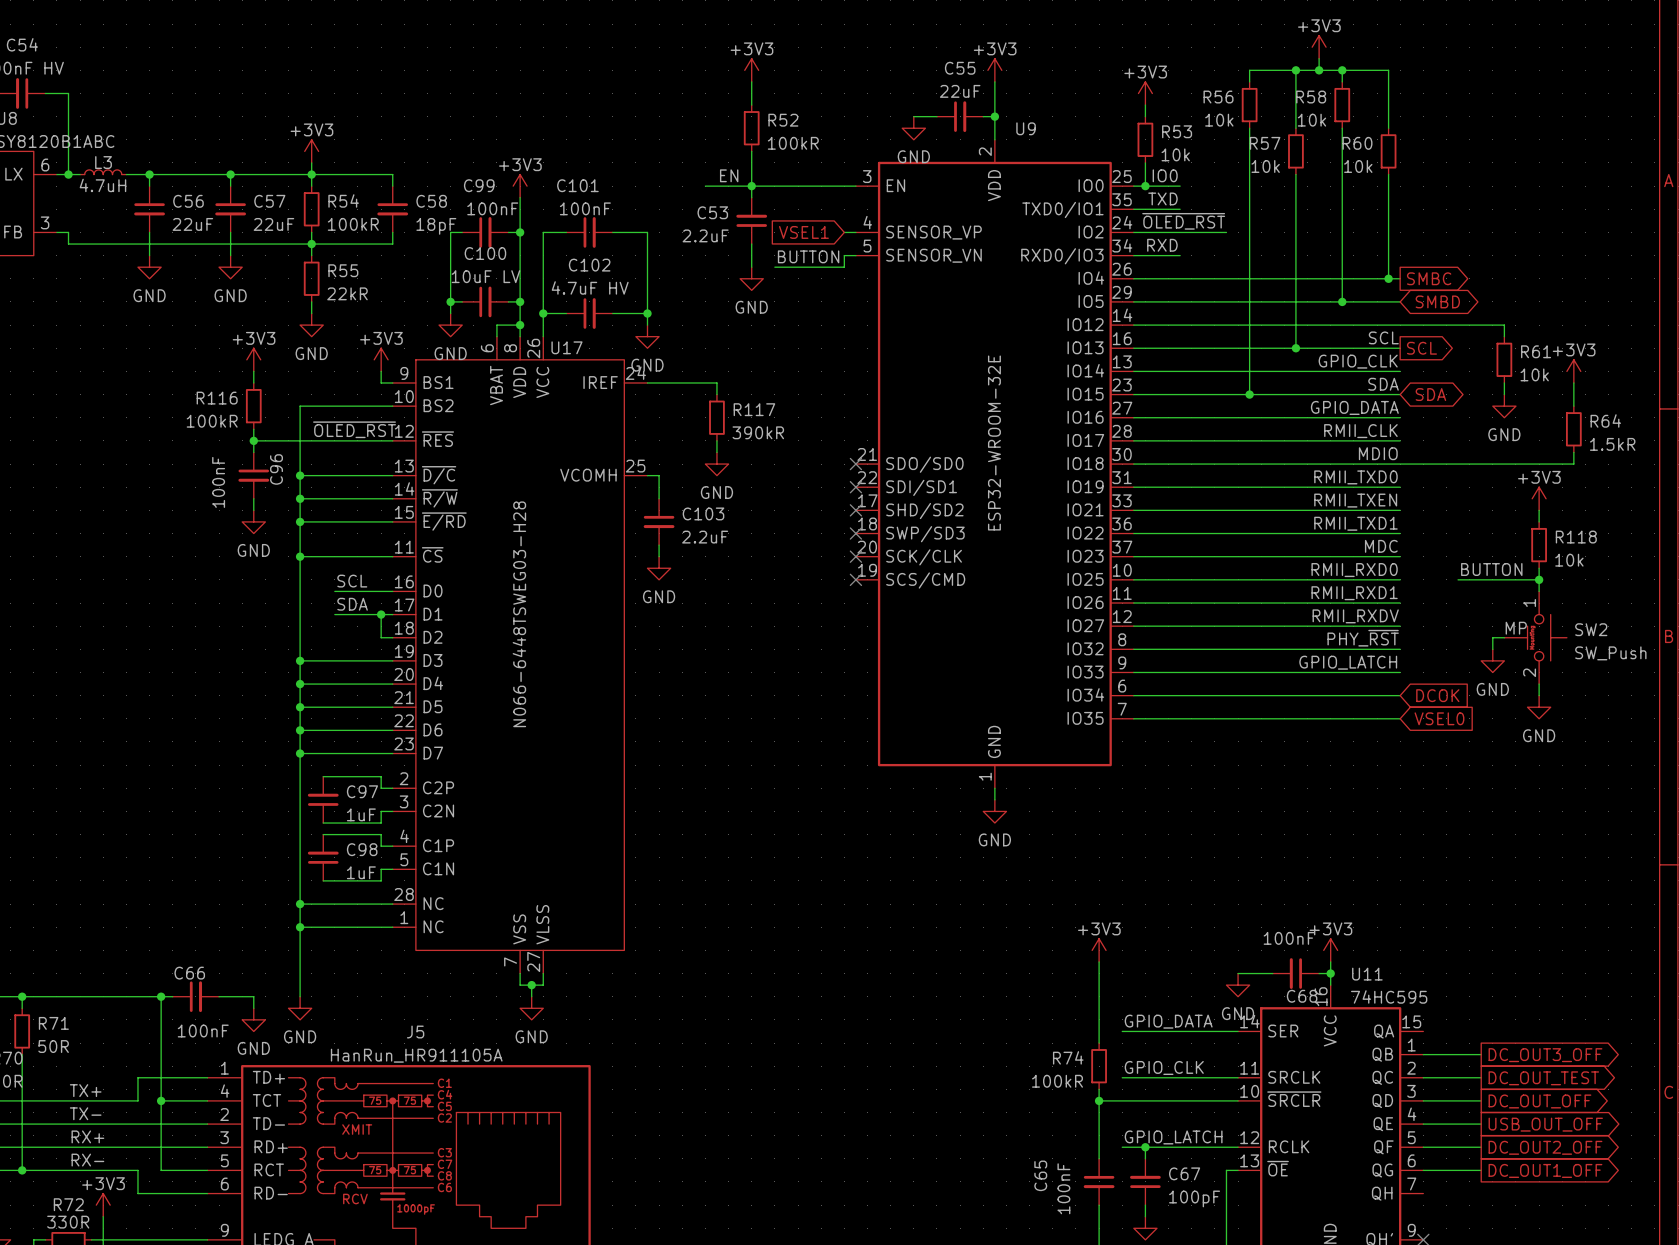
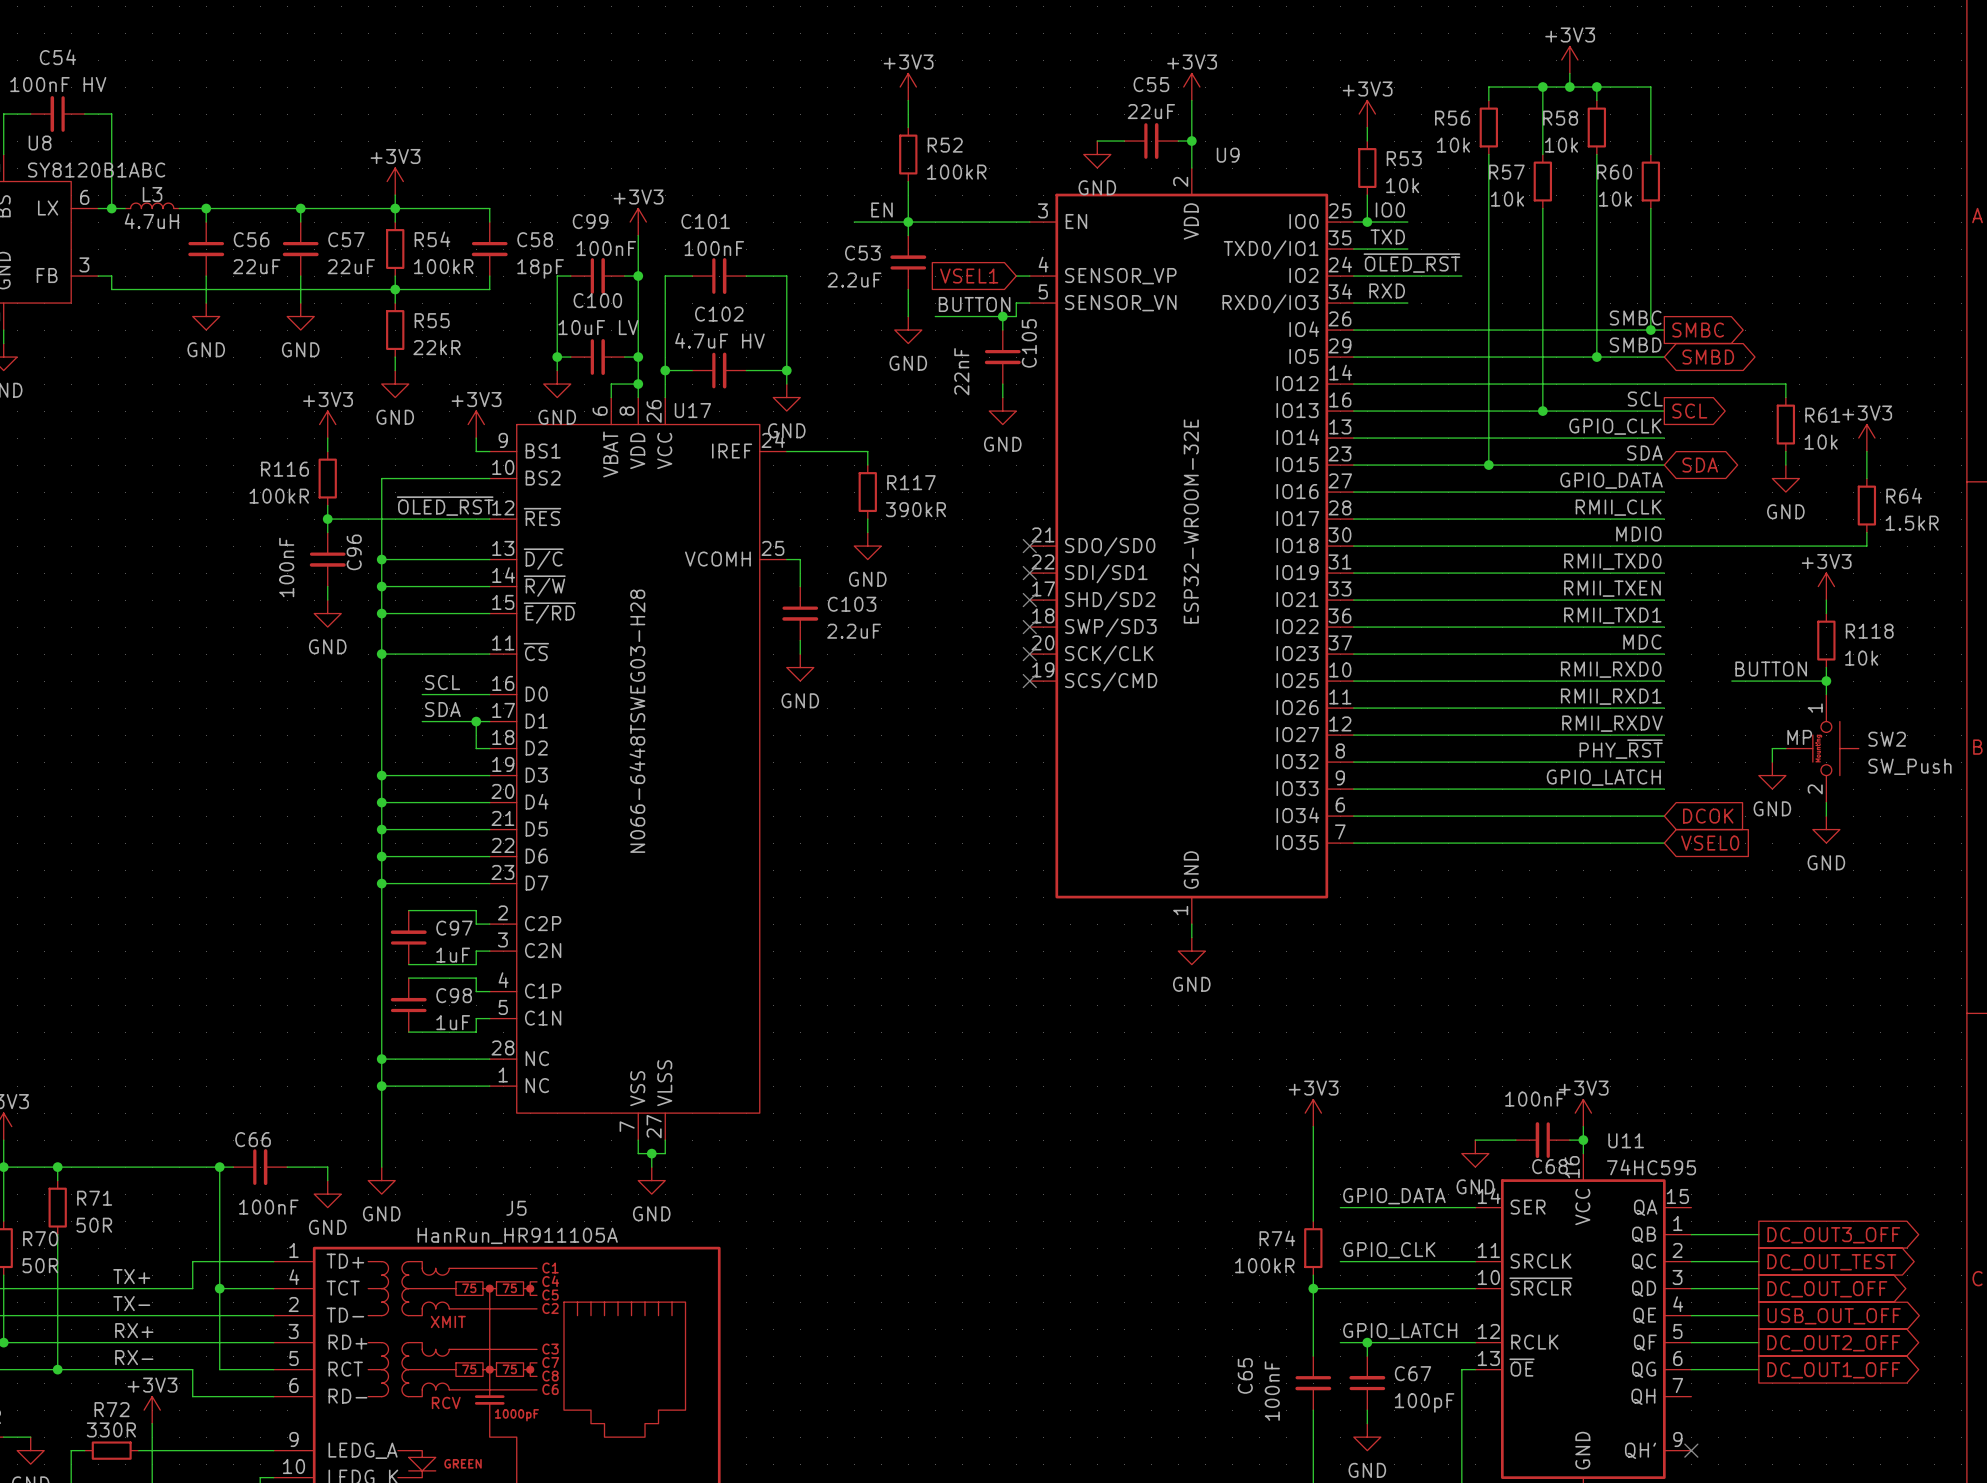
wire: none -> (1002, 316) (1002, 330)
junction: none -> (1002, 316)
label: none -> SMBC (1635, 317)
label: none -> SMBD (1635, 344)
C105: none -> 22nF (1002, 357)
wire: none -> (1002, 384) (1002, 397)
power symbol: none -> GND (1002, 411)

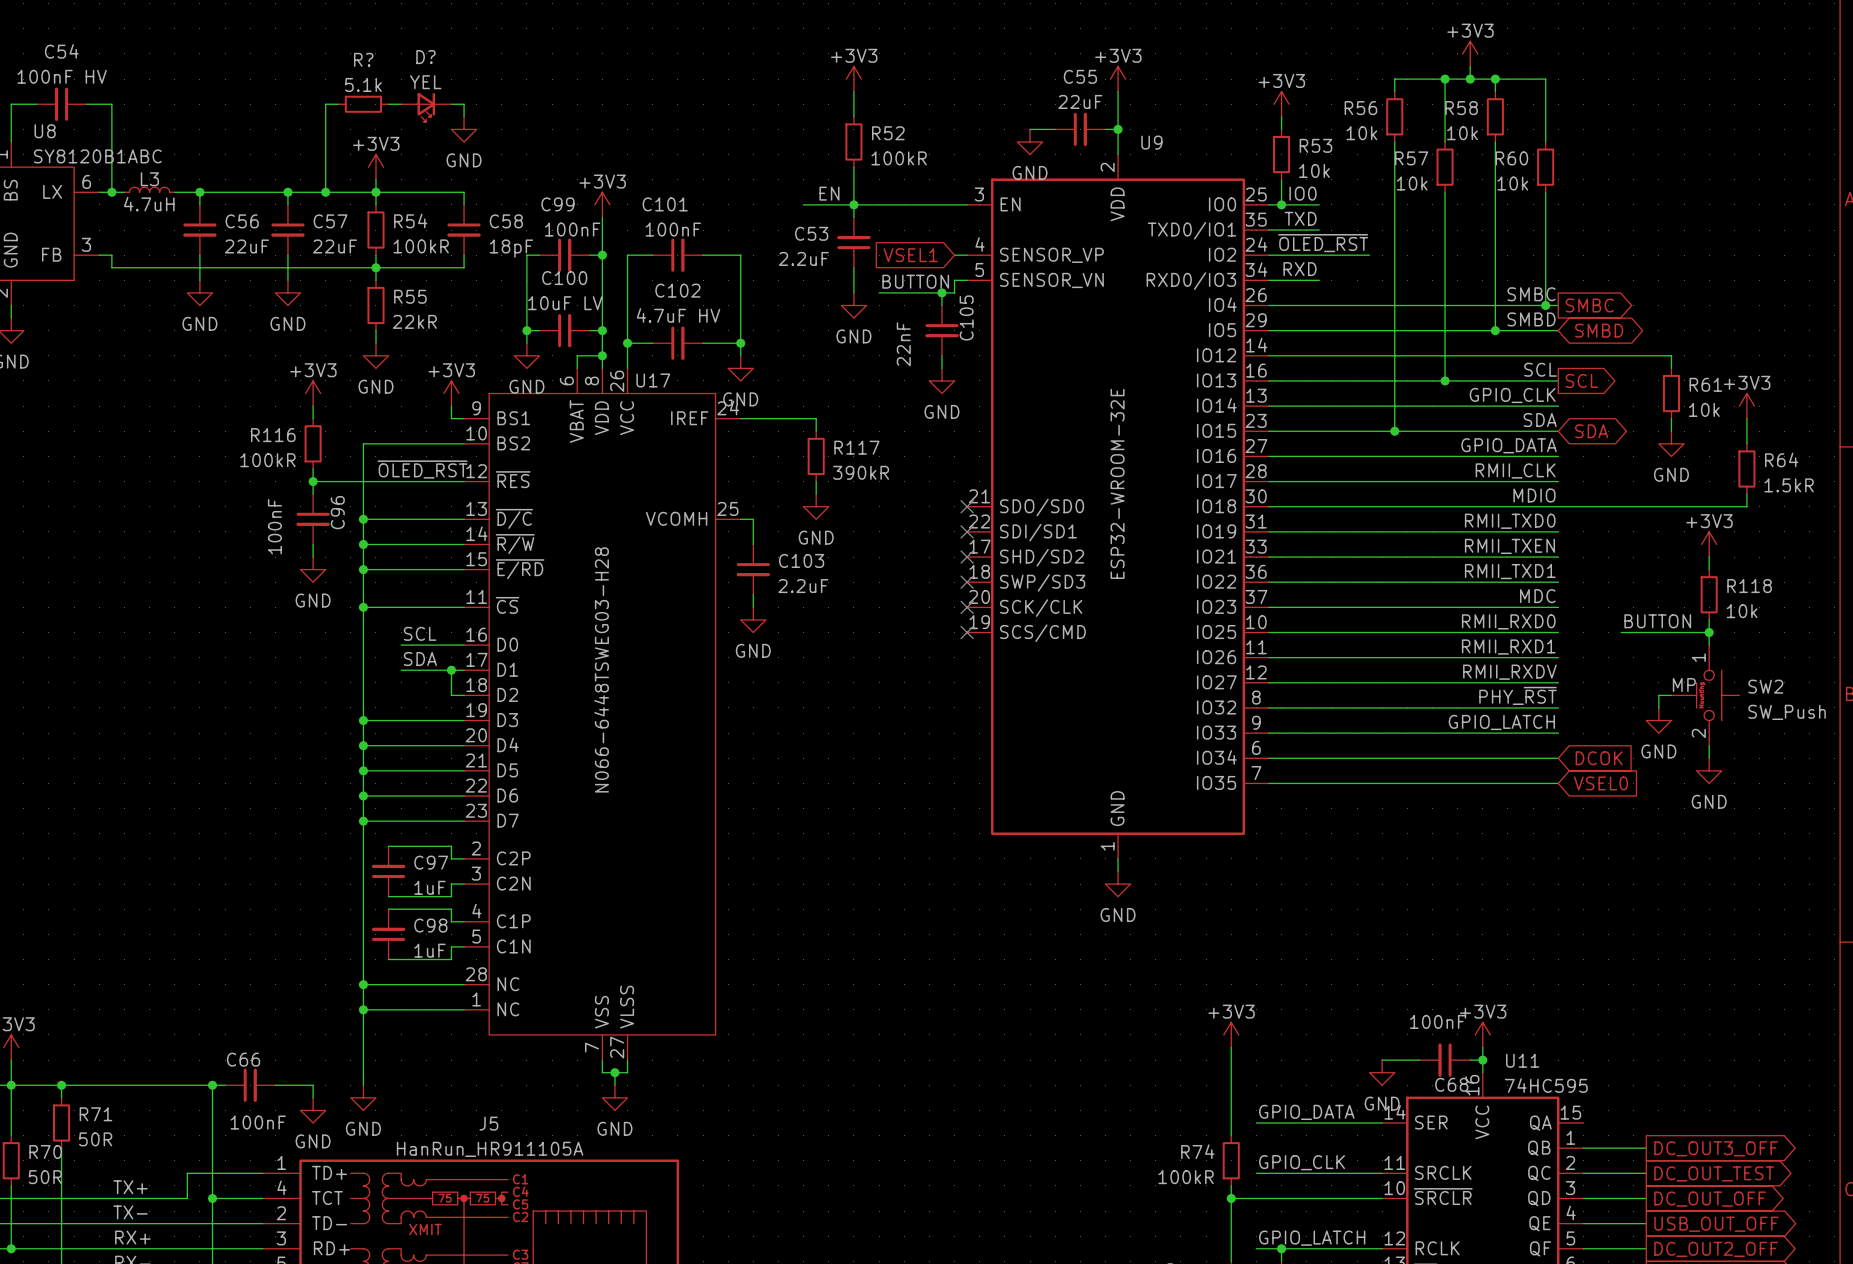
wire: none -> (338, 104) (325, 104) (325, 192)
R?: none -> 5.1k (363, 104)
wire: none -> (388, 104) (401, 104)
wire: none -> (451, 104) (464, 104) (464, 116)
D?: none -> YEL (426, 107)
power symbol: none -> GND (464, 129)
junction: none -> (325, 192)

